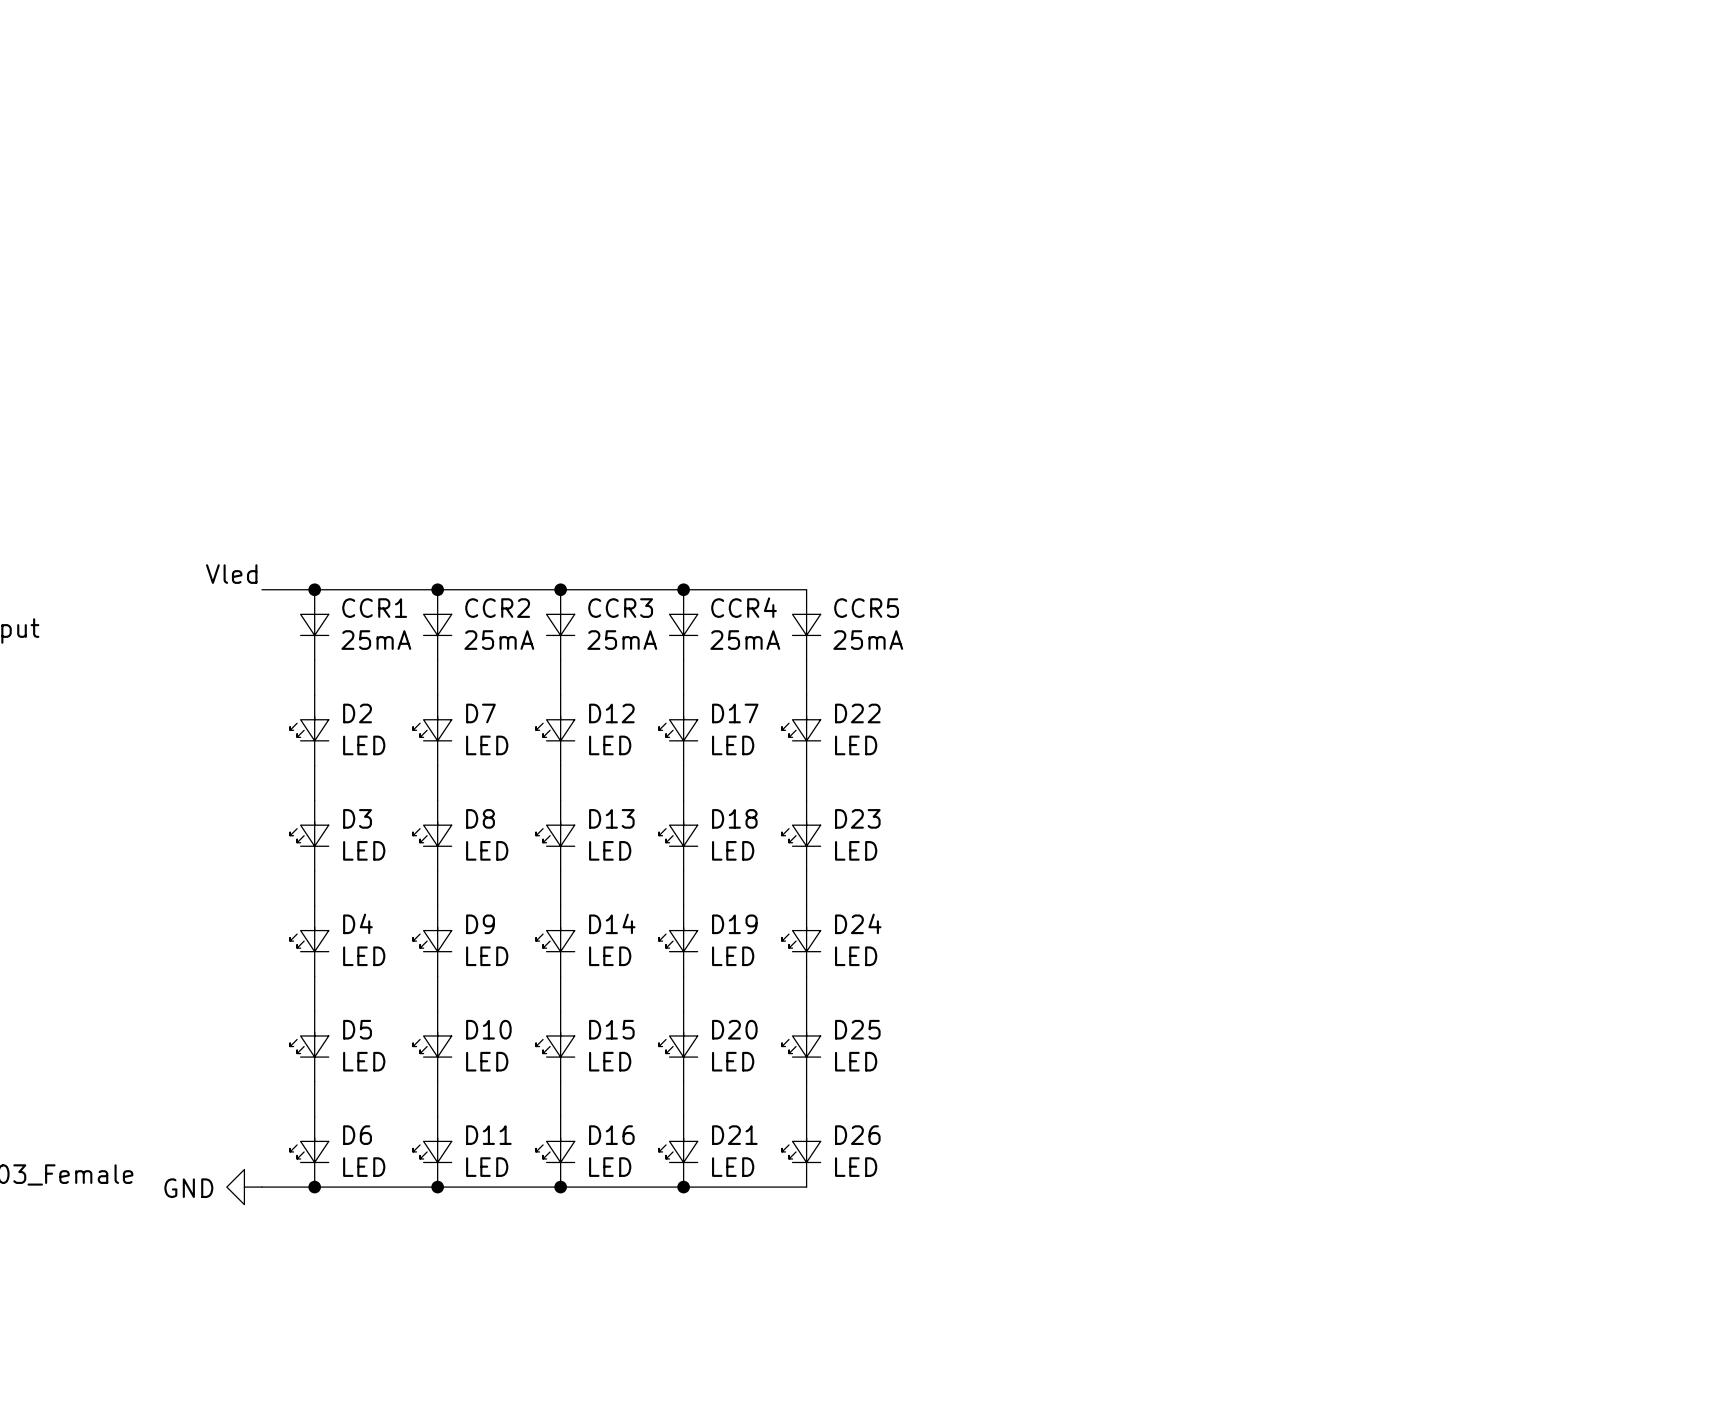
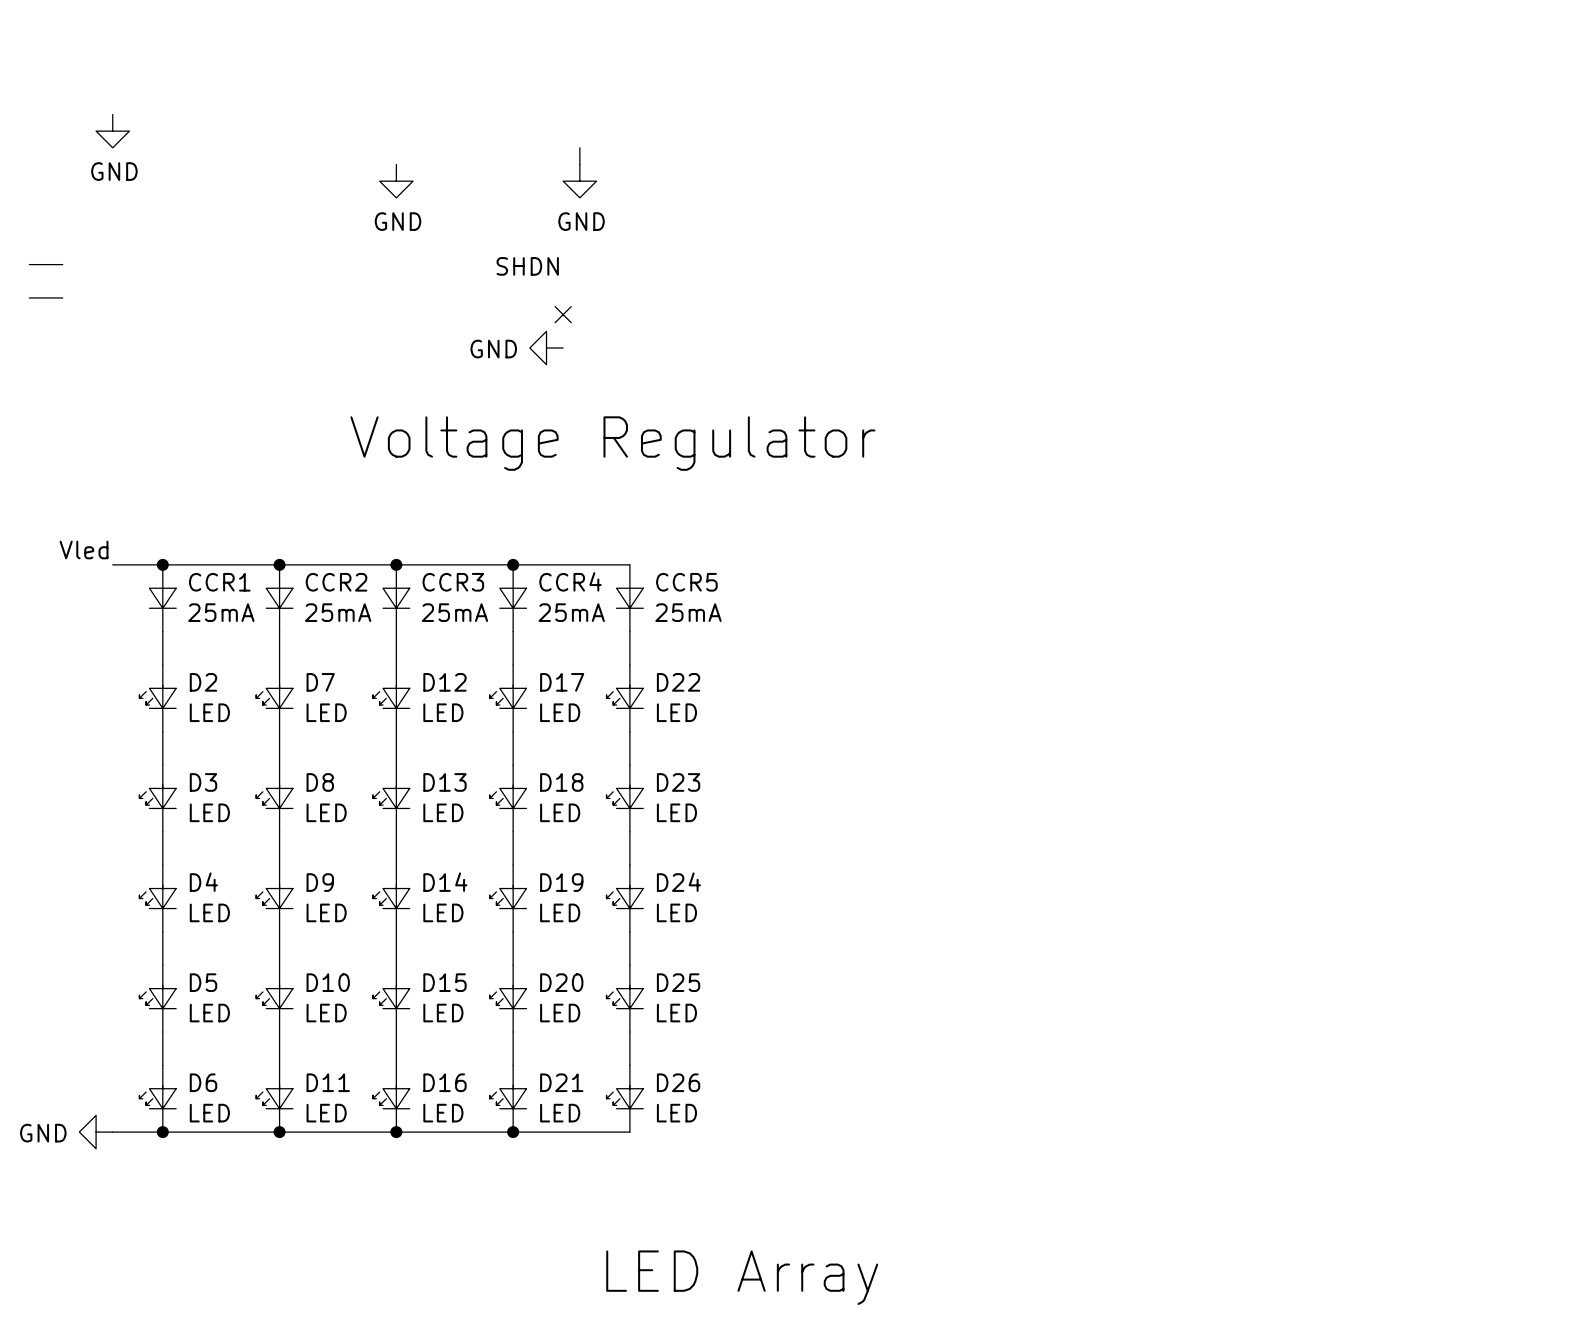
power symbol: none -> GND (112, 131)
wire: none -> (579, 147) (579, 164)
power symbol: none -> GND (396, 181)
power symbol: none -> GND (579, 181)
wire: none -> (29, 264) (62, 264)
label: none -> SHDN (527, 266)
wire: none -> (29, 297) (62, 297)
no-connect mark: none -> (563, 314)
power symbol: none -> GND (546, 348)
text: none -> Voltage Regulator (612, 443)
text: none -> LED Array (742, 1277)

